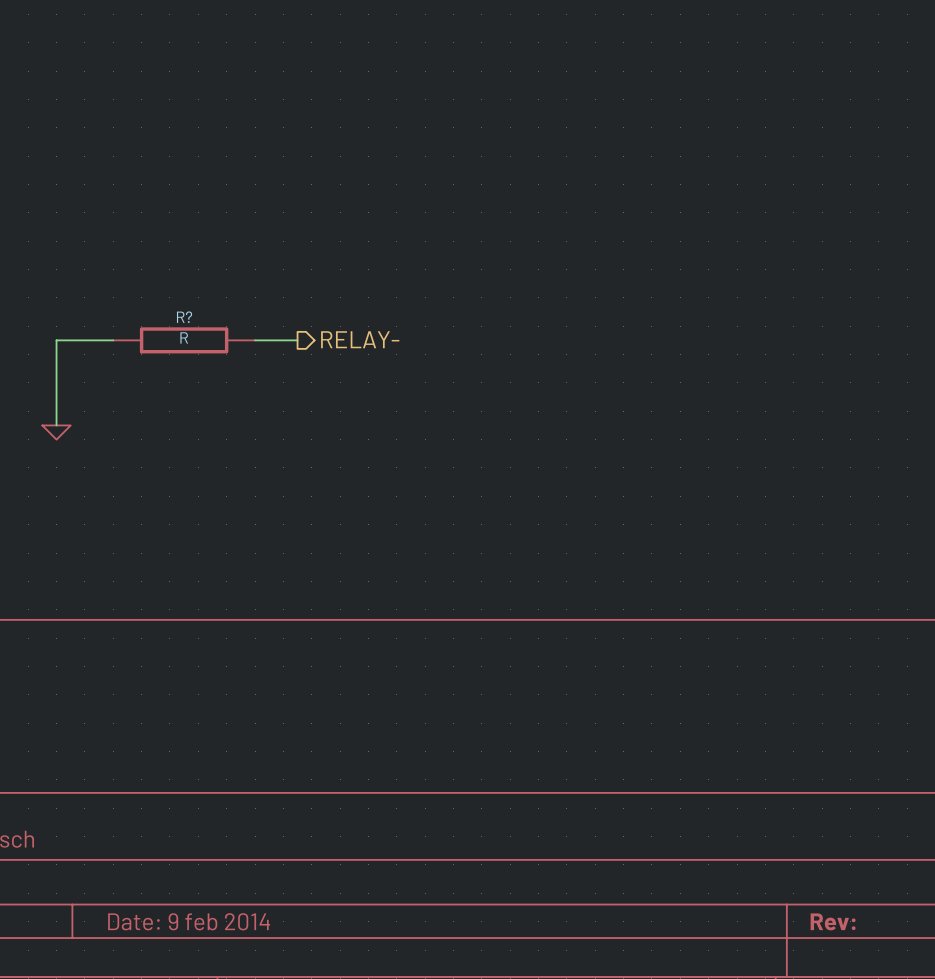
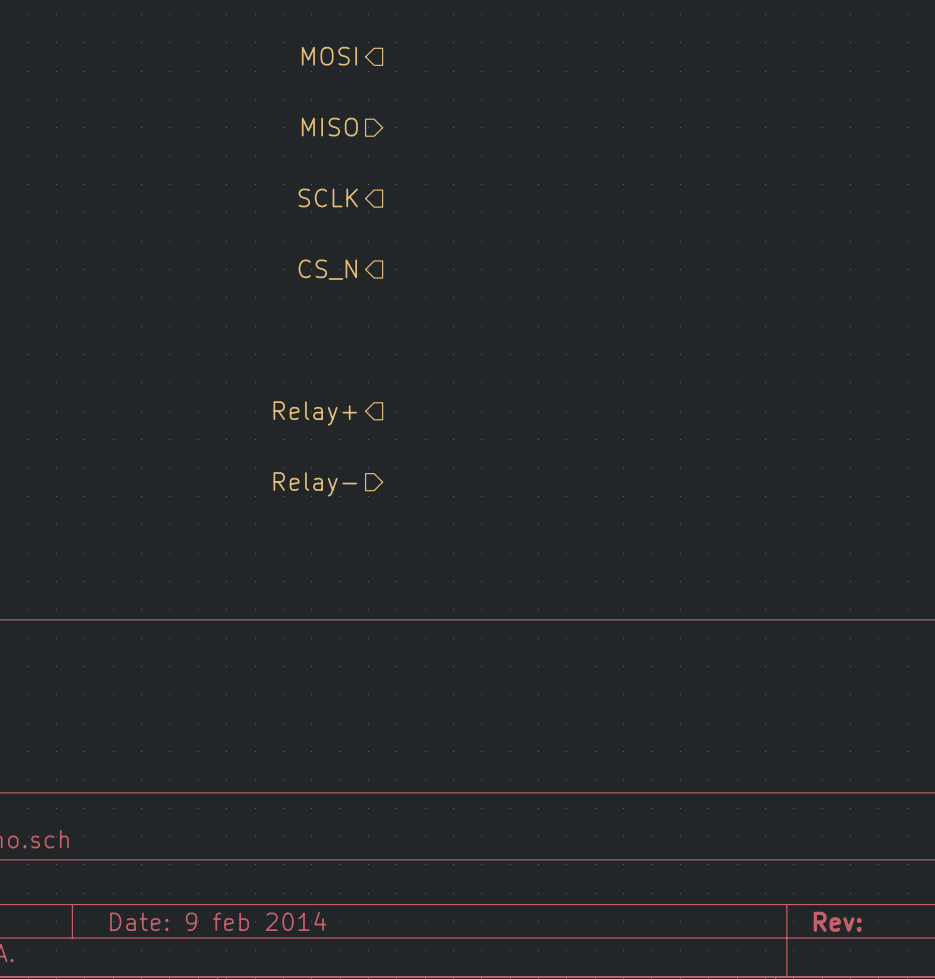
hierarchical label: none -> MOSI (329, 56)
hierarchical label: none -> MISO (329, 127)
hierarchical label: none -> SCLK (328, 197)
hierarchical label: none -> CS_N (327, 269)
hierarchical label: RELAY- (360, 339) -> none
wire: (113, 340) (56, 340) (56, 425) -> none
R?: R (184, 340) -> none
wire: (255, 340) (297, 340) -> none
hierarchical label: none -> Relay+ (315, 413)
power symbol: (56, 432) -> none
hierarchical label: none -> Relay- (315, 484)

